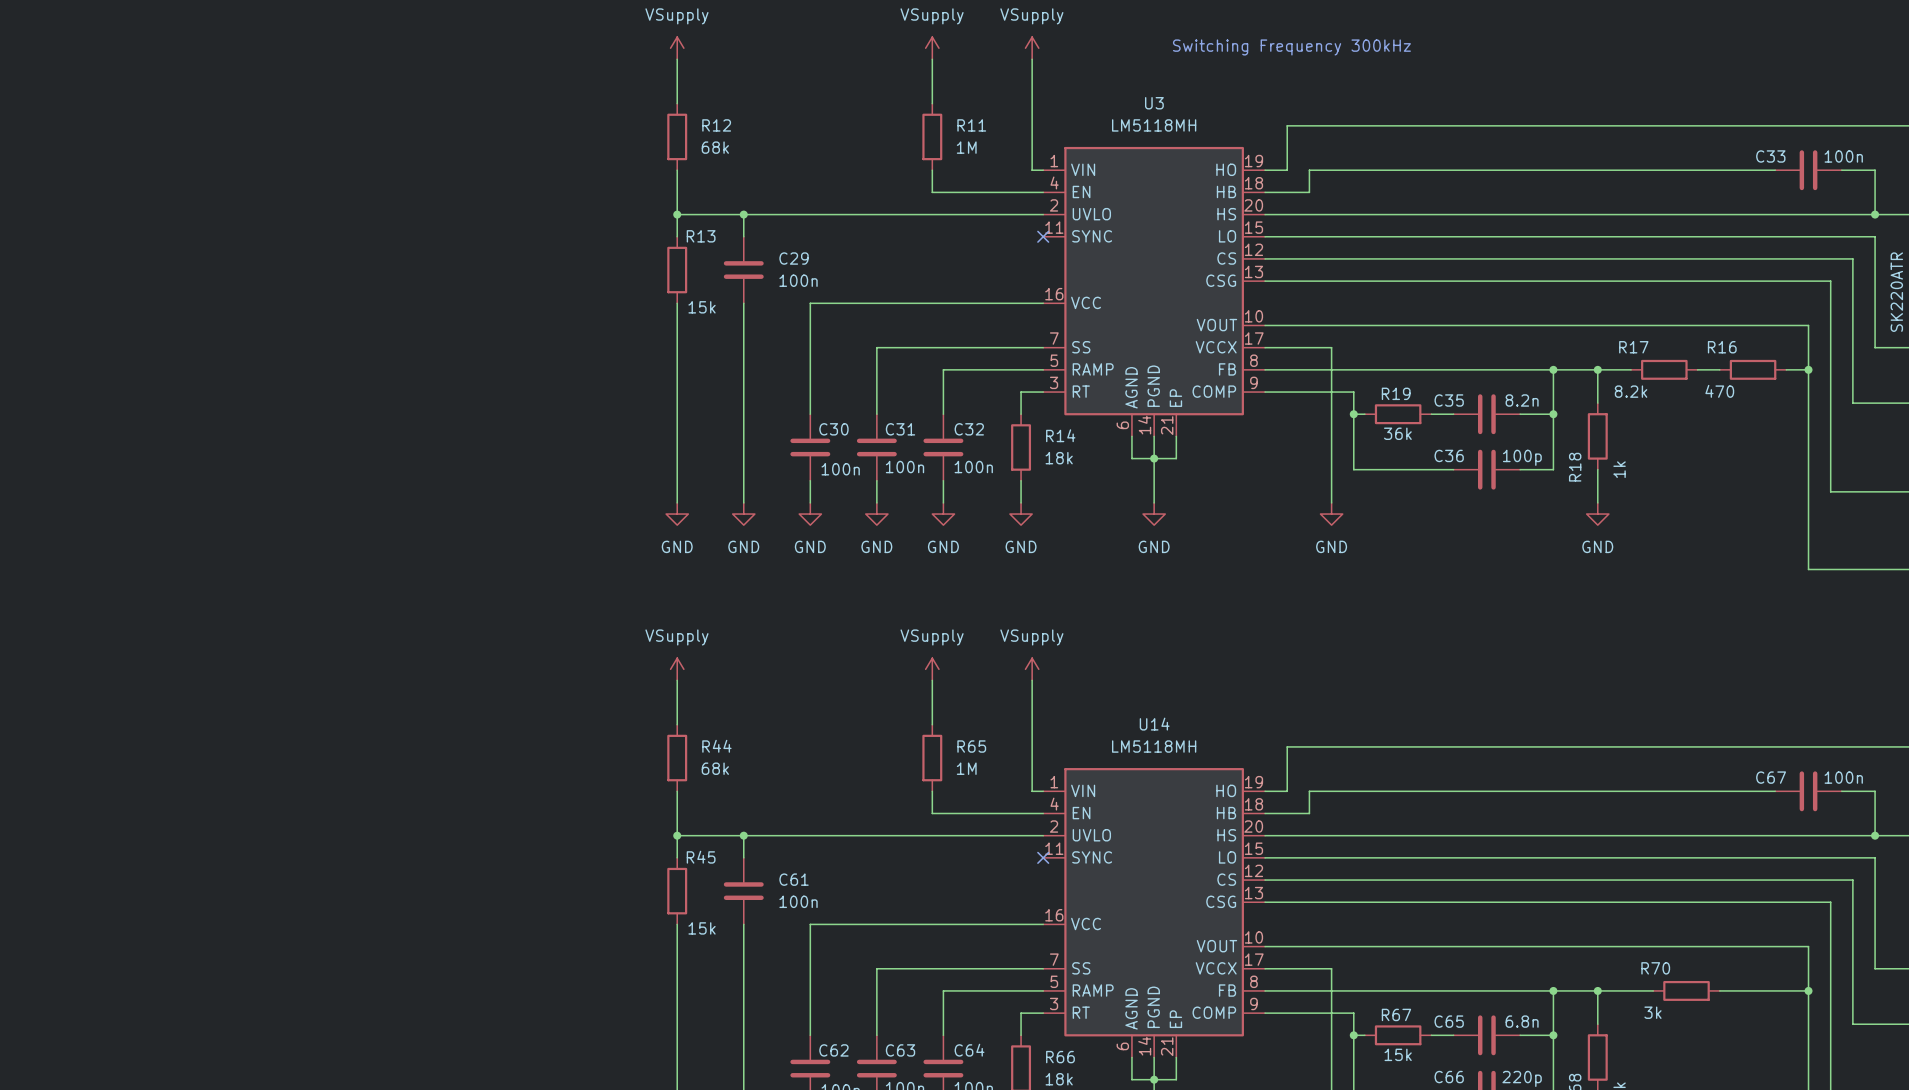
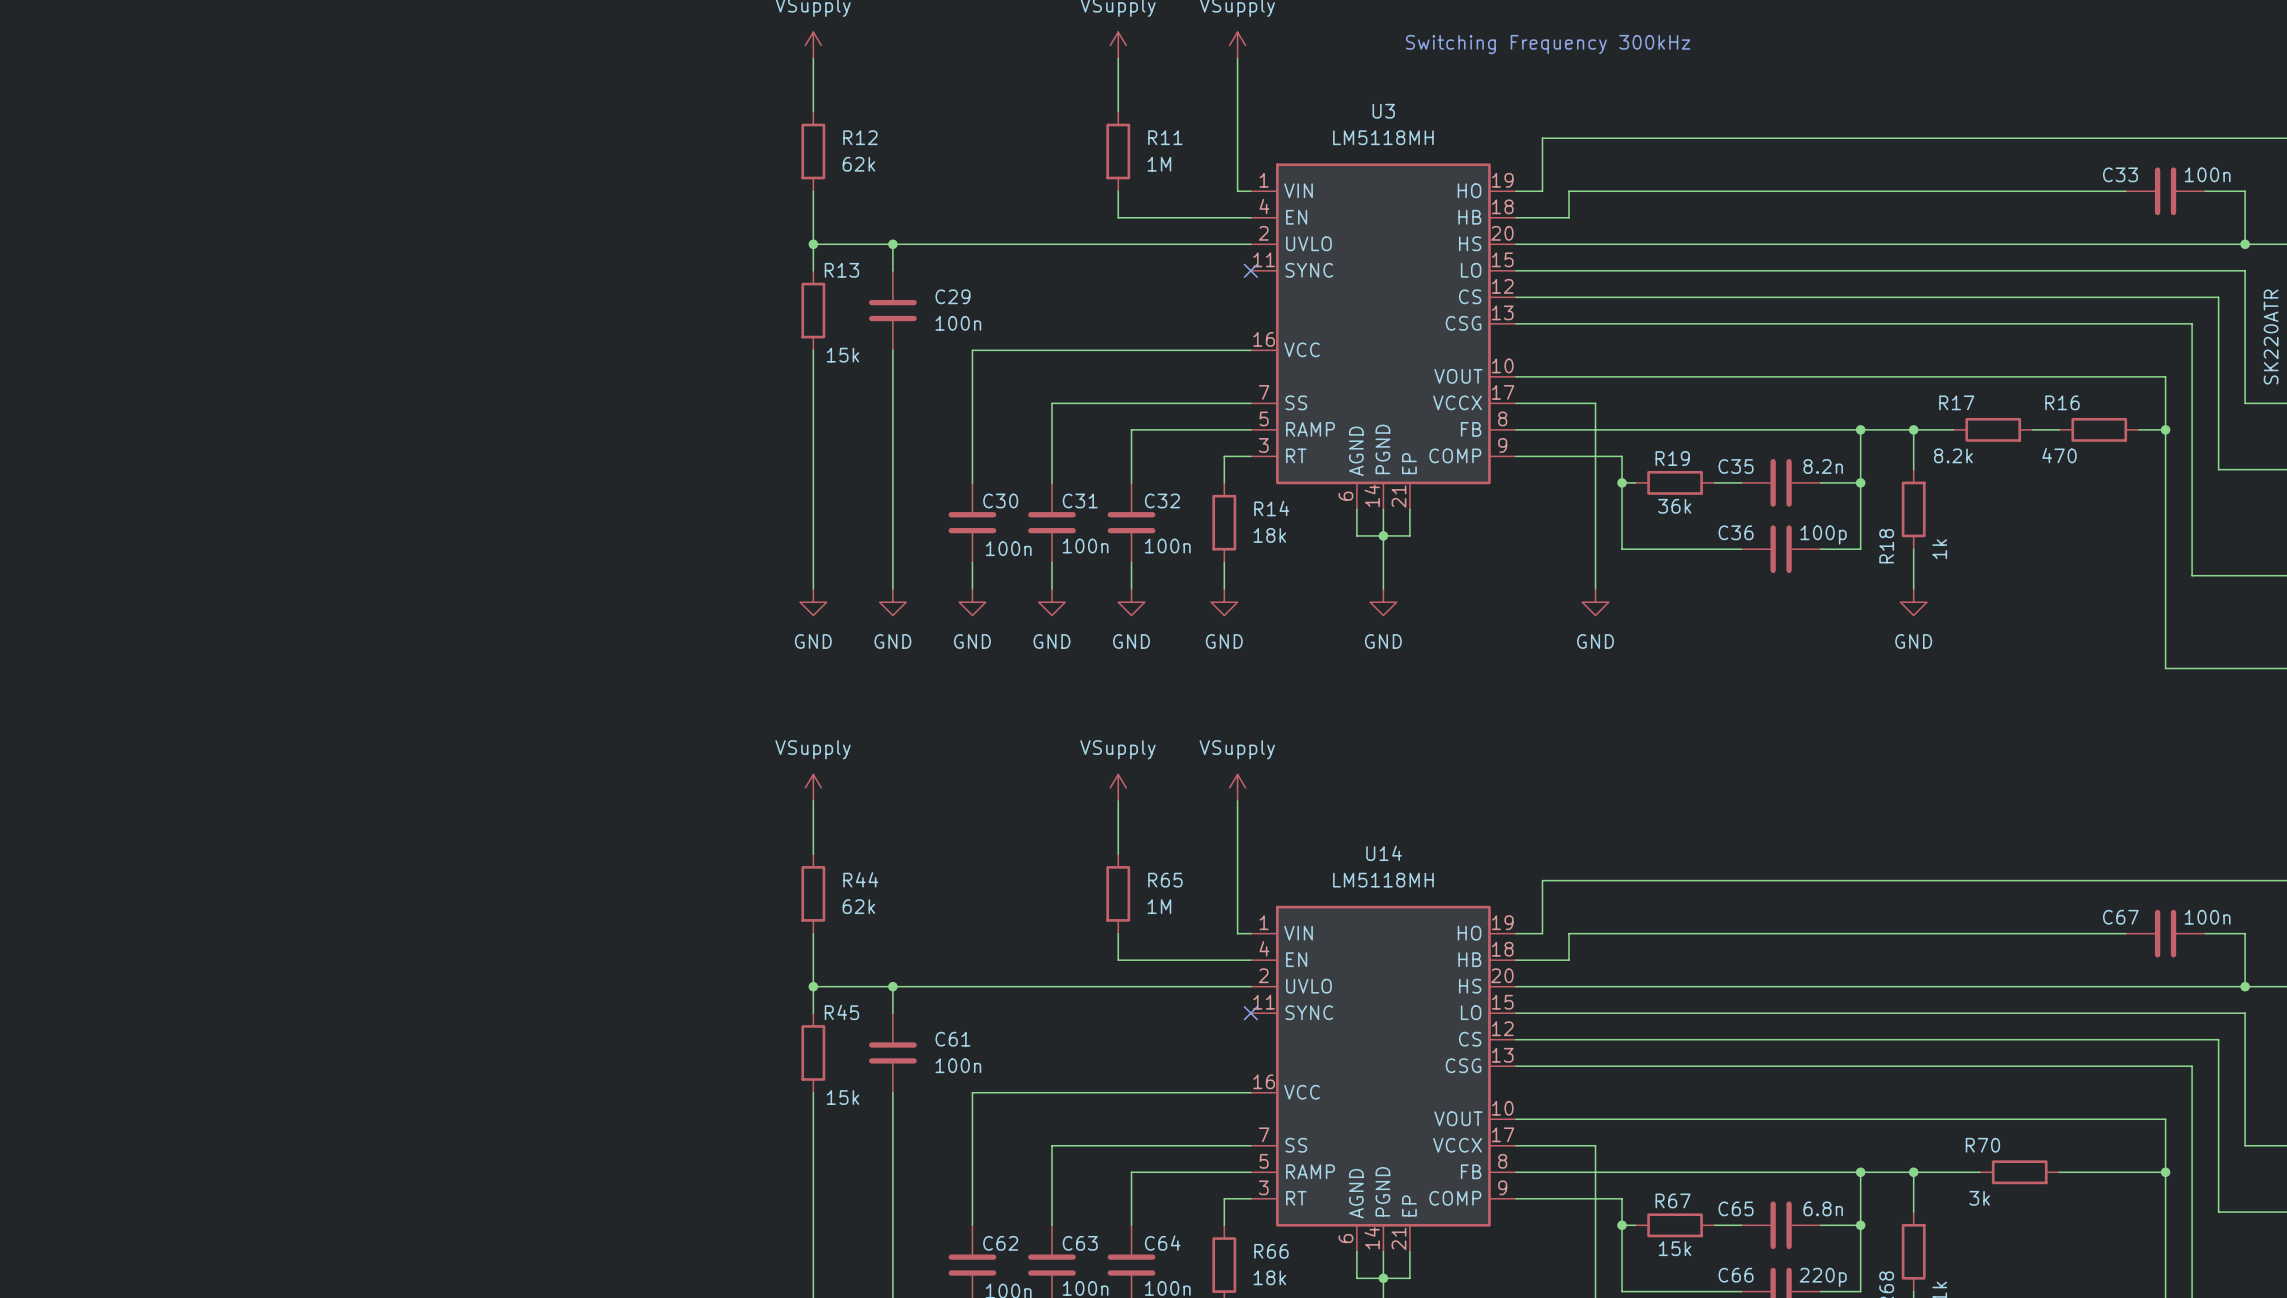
R12 value: 68k (715, 147) -> 62k (858, 164)
R44 value: 68k (715, 768) -> 62k (858, 906)

